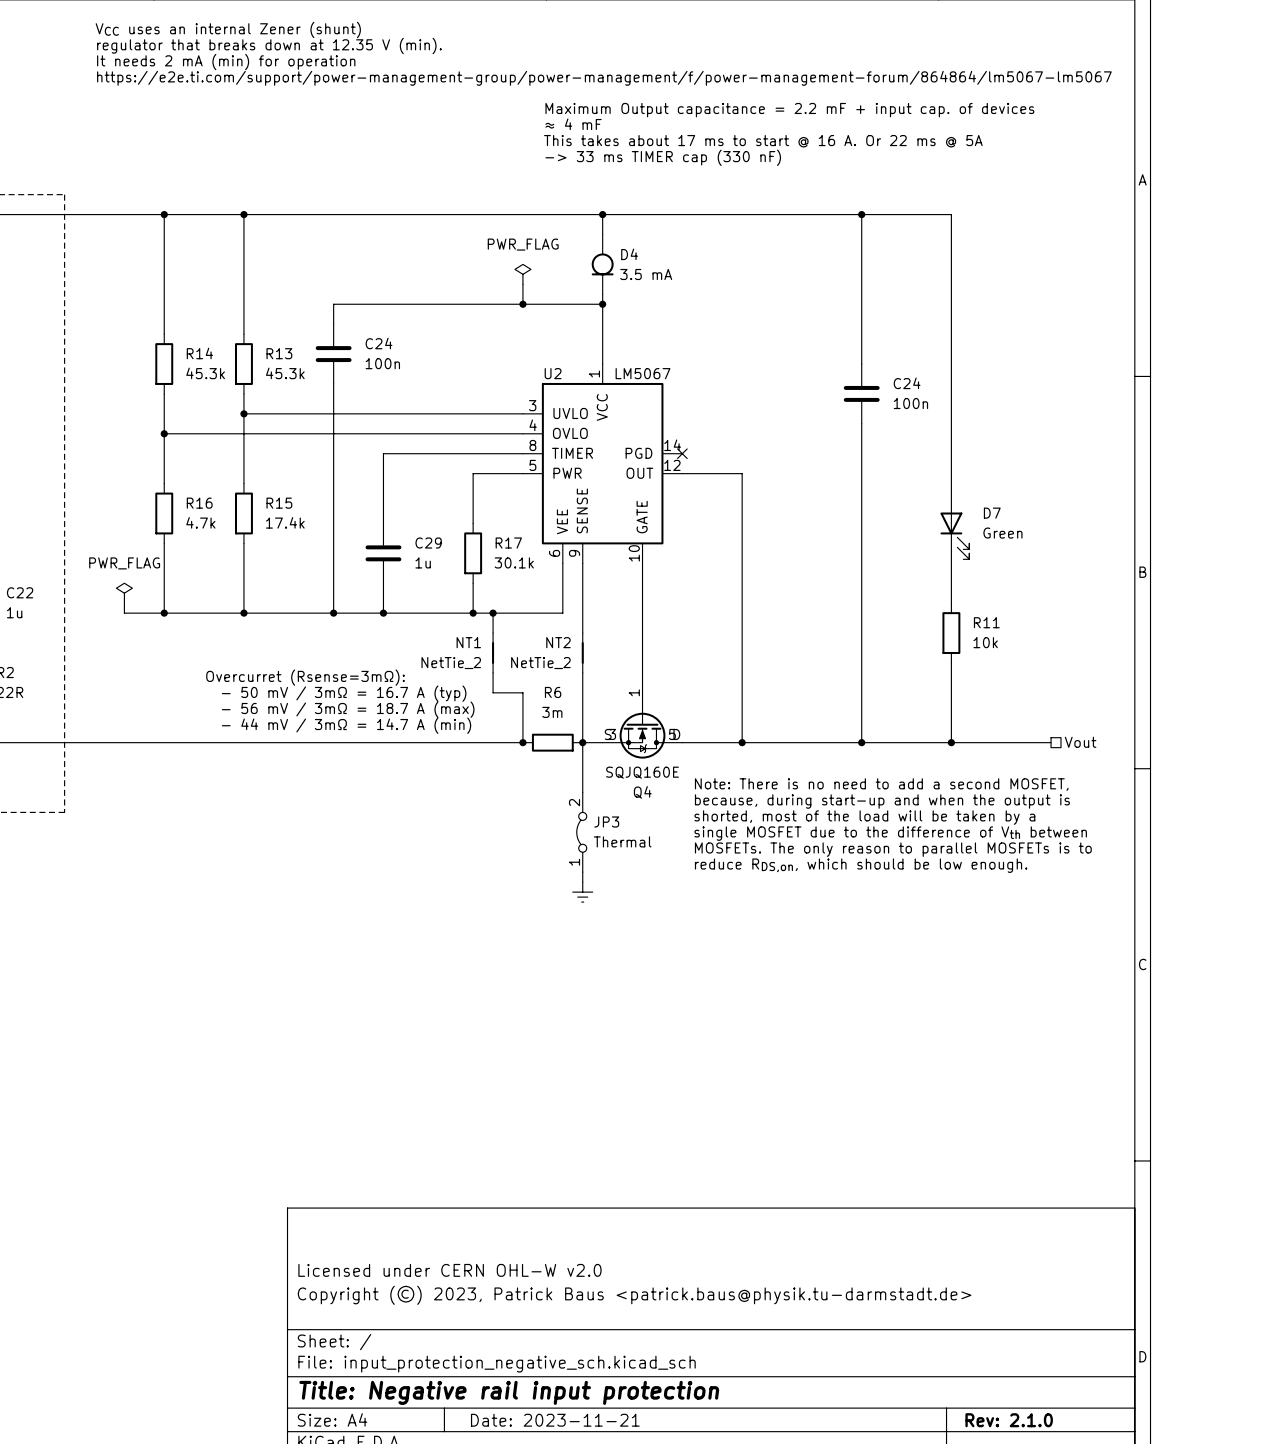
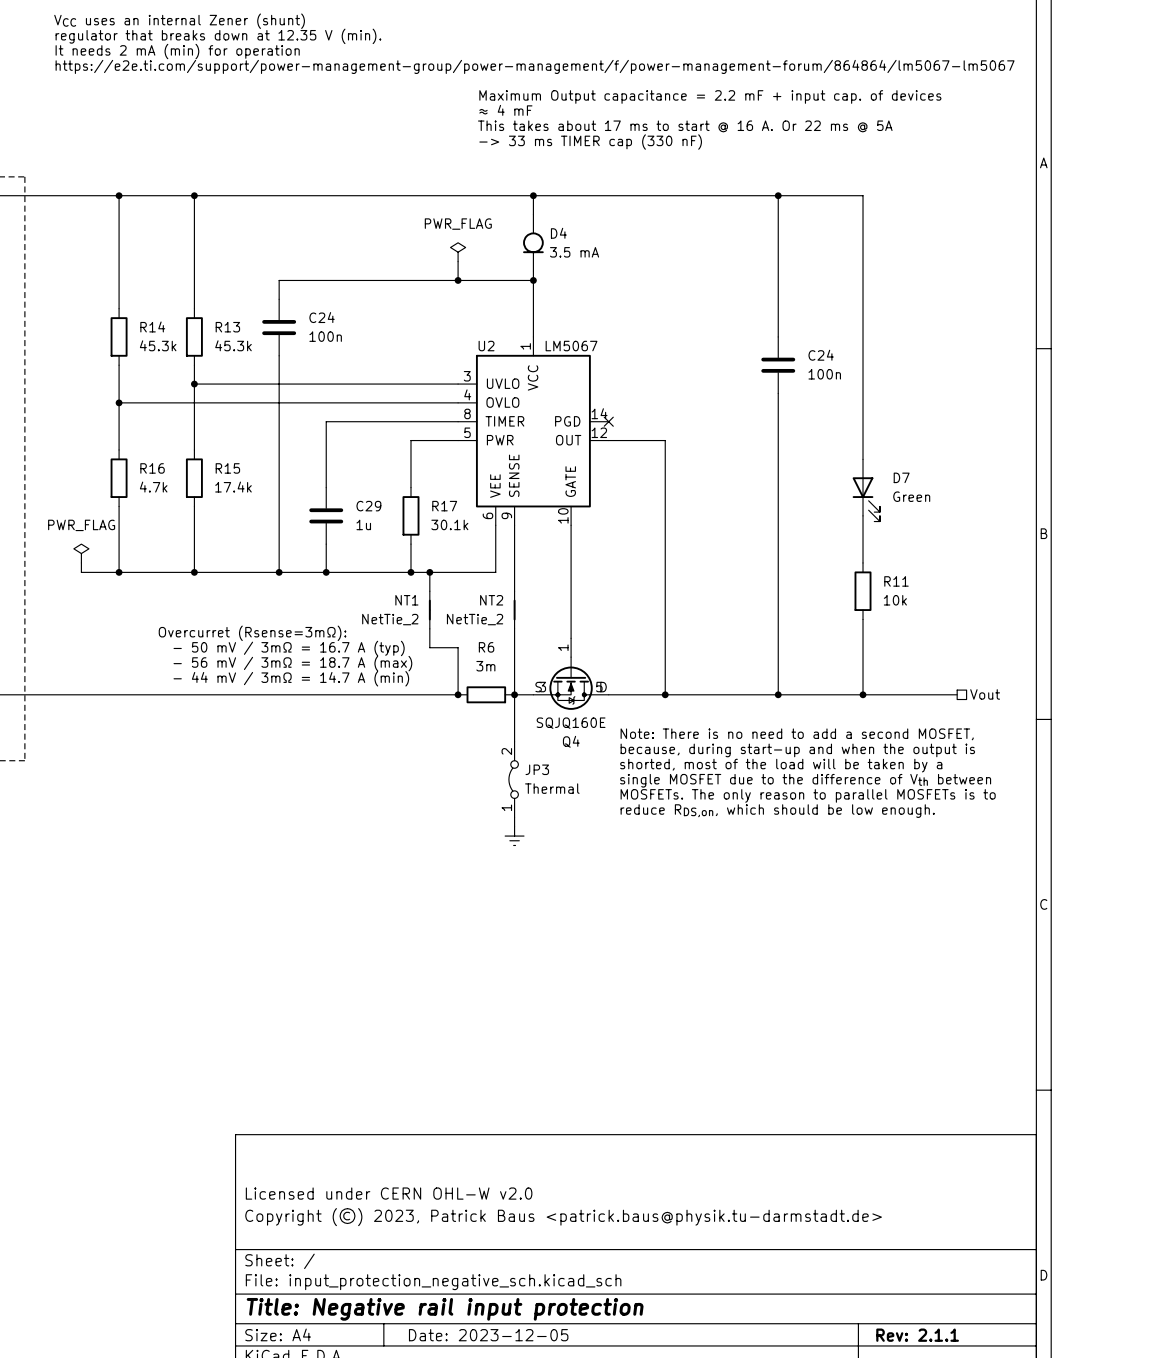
title block: Date: 2023-11-21 (555, 1420) -> Date: 2023-12-05 (488, 1335)
title block: Rev: 2.1.0 (1009, 1420) -> Rev: 2.1.1 (917, 1335)

